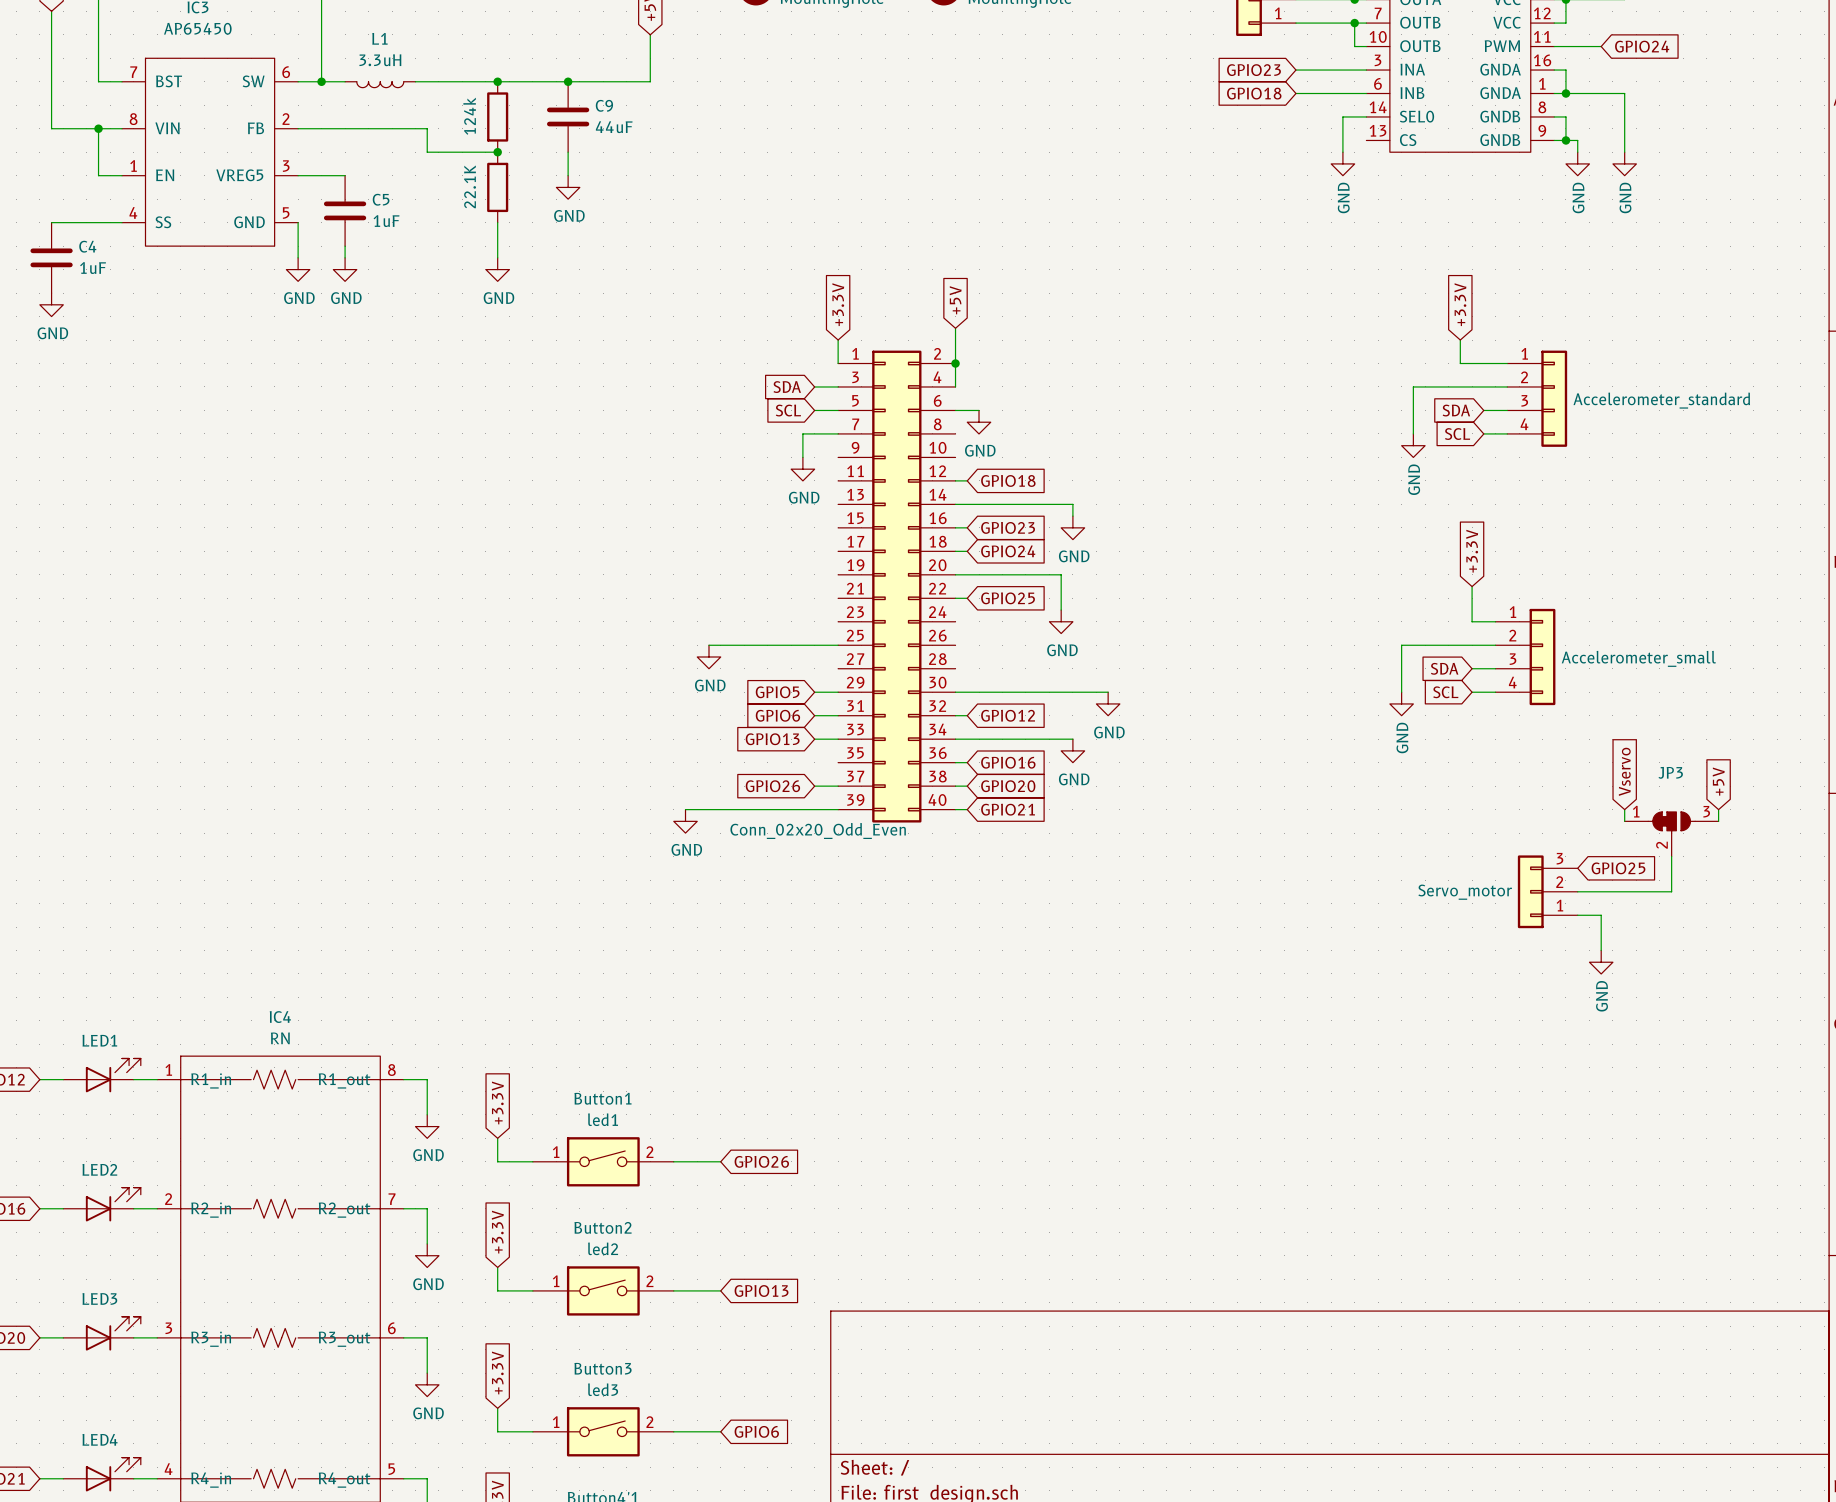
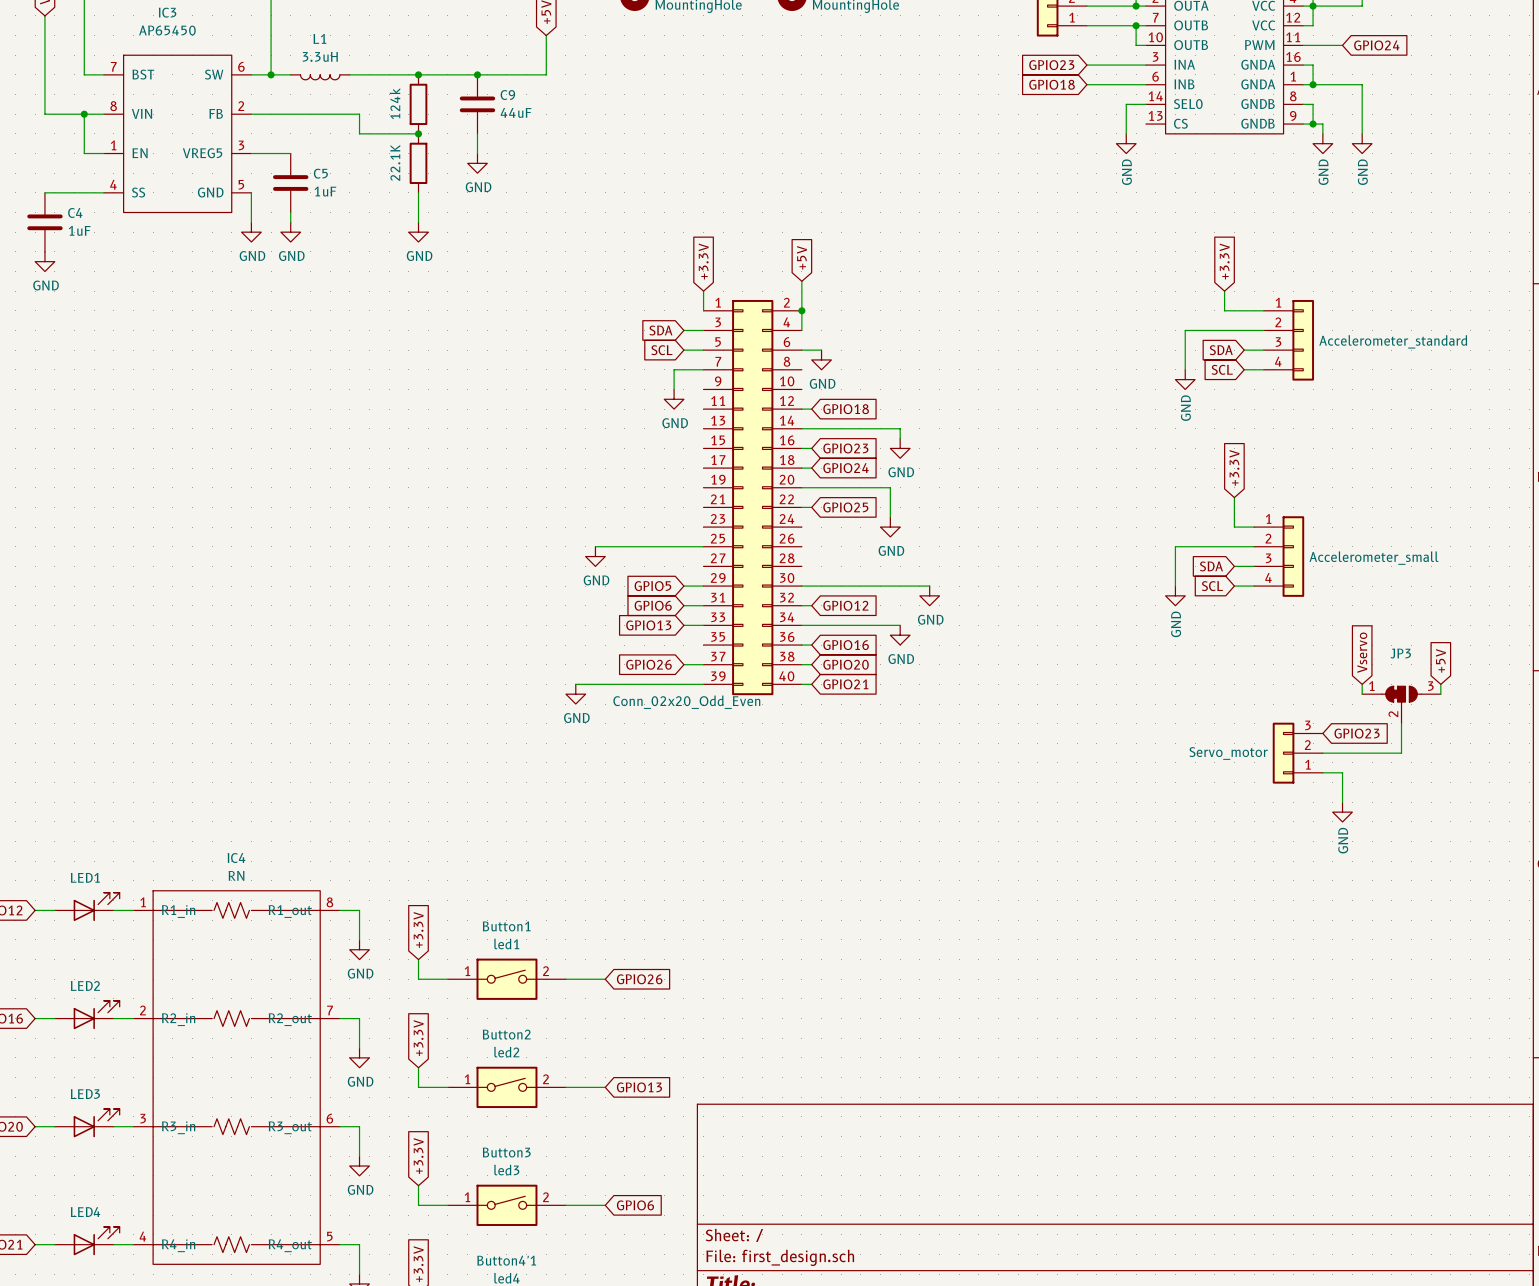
global label: GPIO25 (1618, 868) -> GPIO23 (1357, 733)

